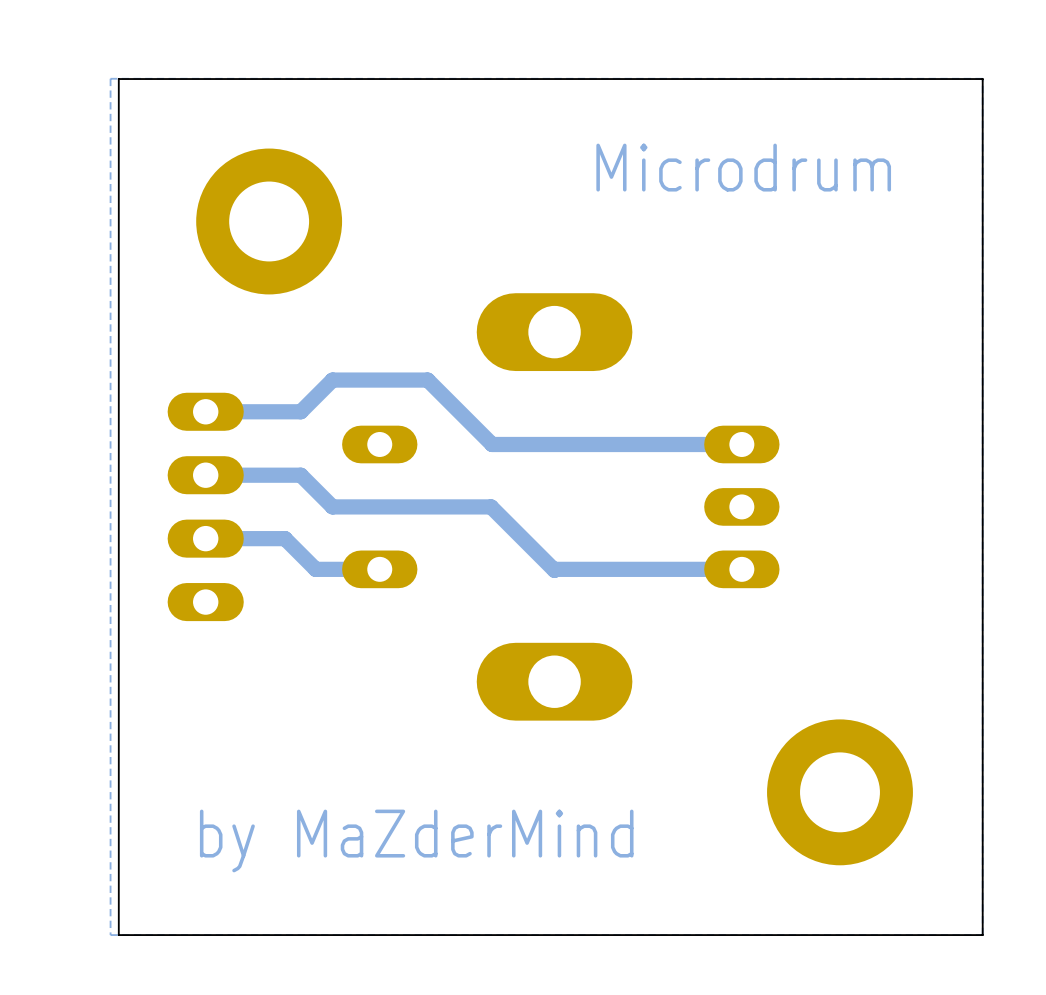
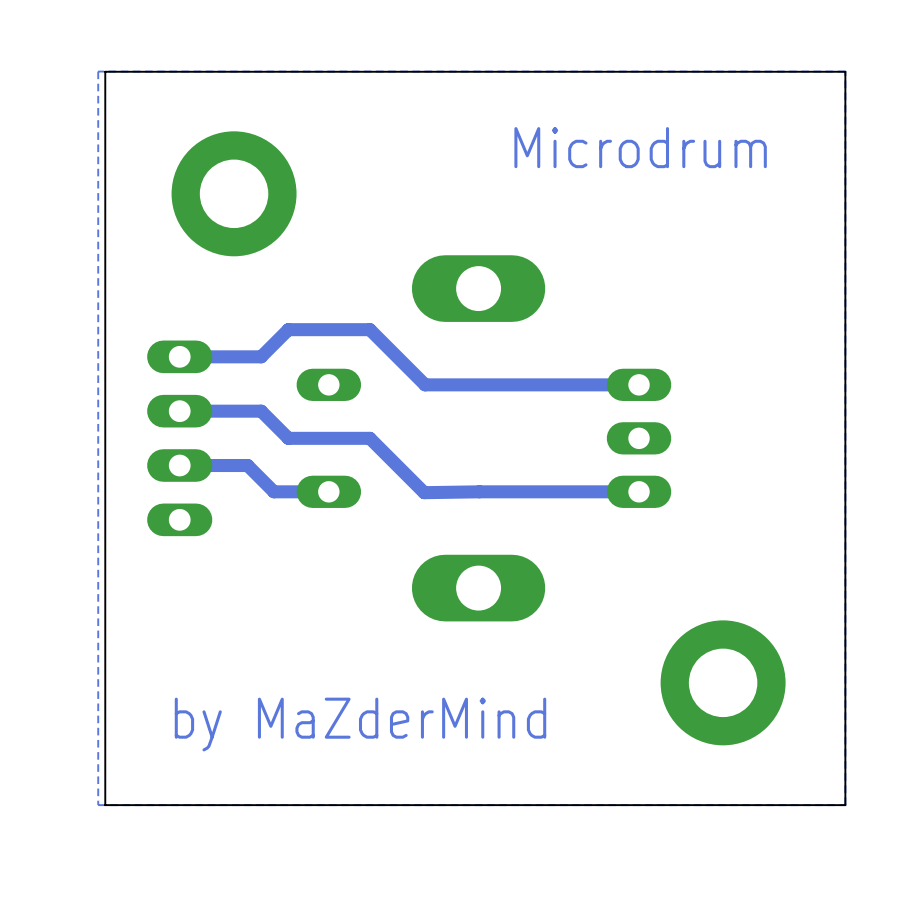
bottom track: (427, 506) (491, 506) (555, 569) -> (369, 438) (424, 492) (479, 491)

